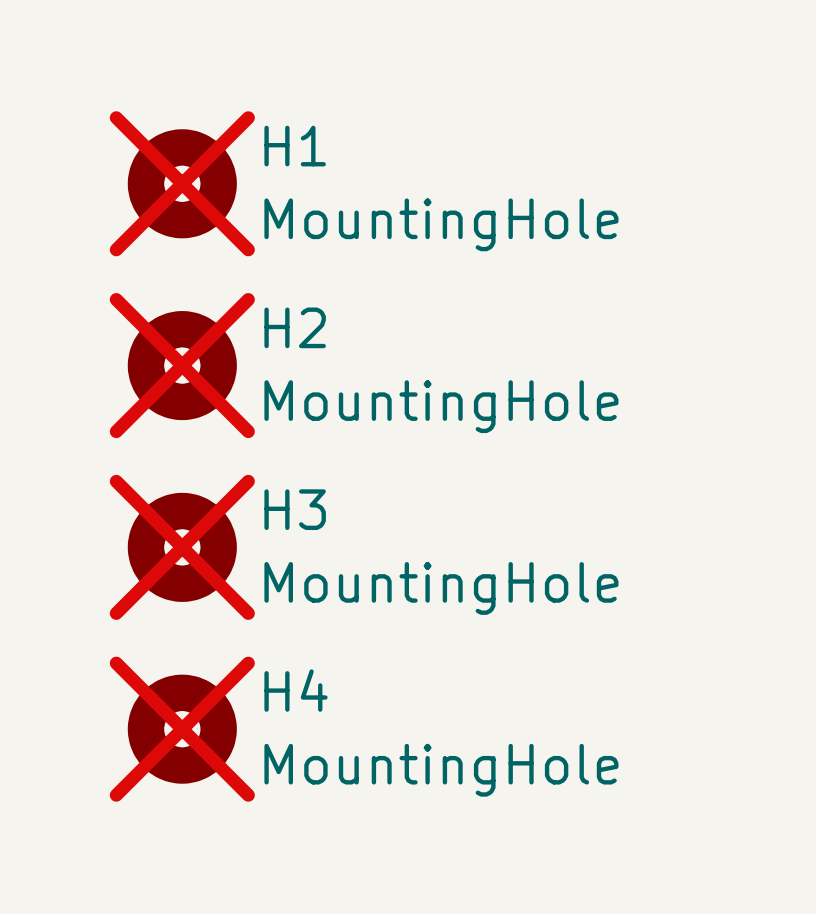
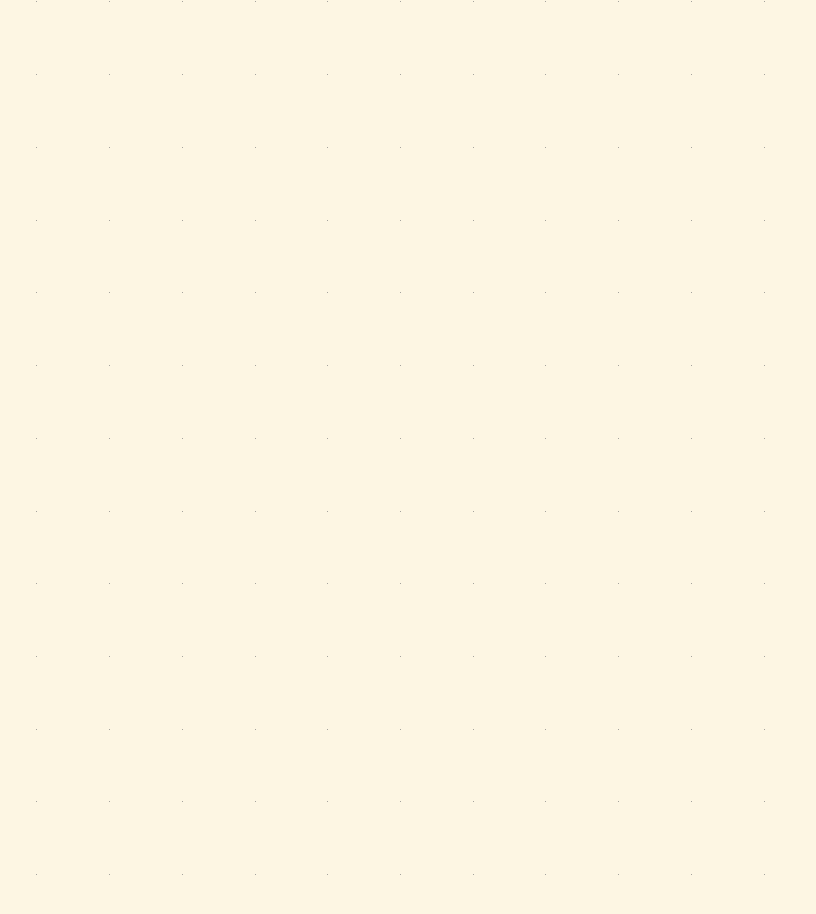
H1: MountingHole (182, 183) -> none
H2: MountingHole (182, 365) -> none
H3: MountingHole (182, 547) -> none
H4: MountingHole (182, 729) -> none

